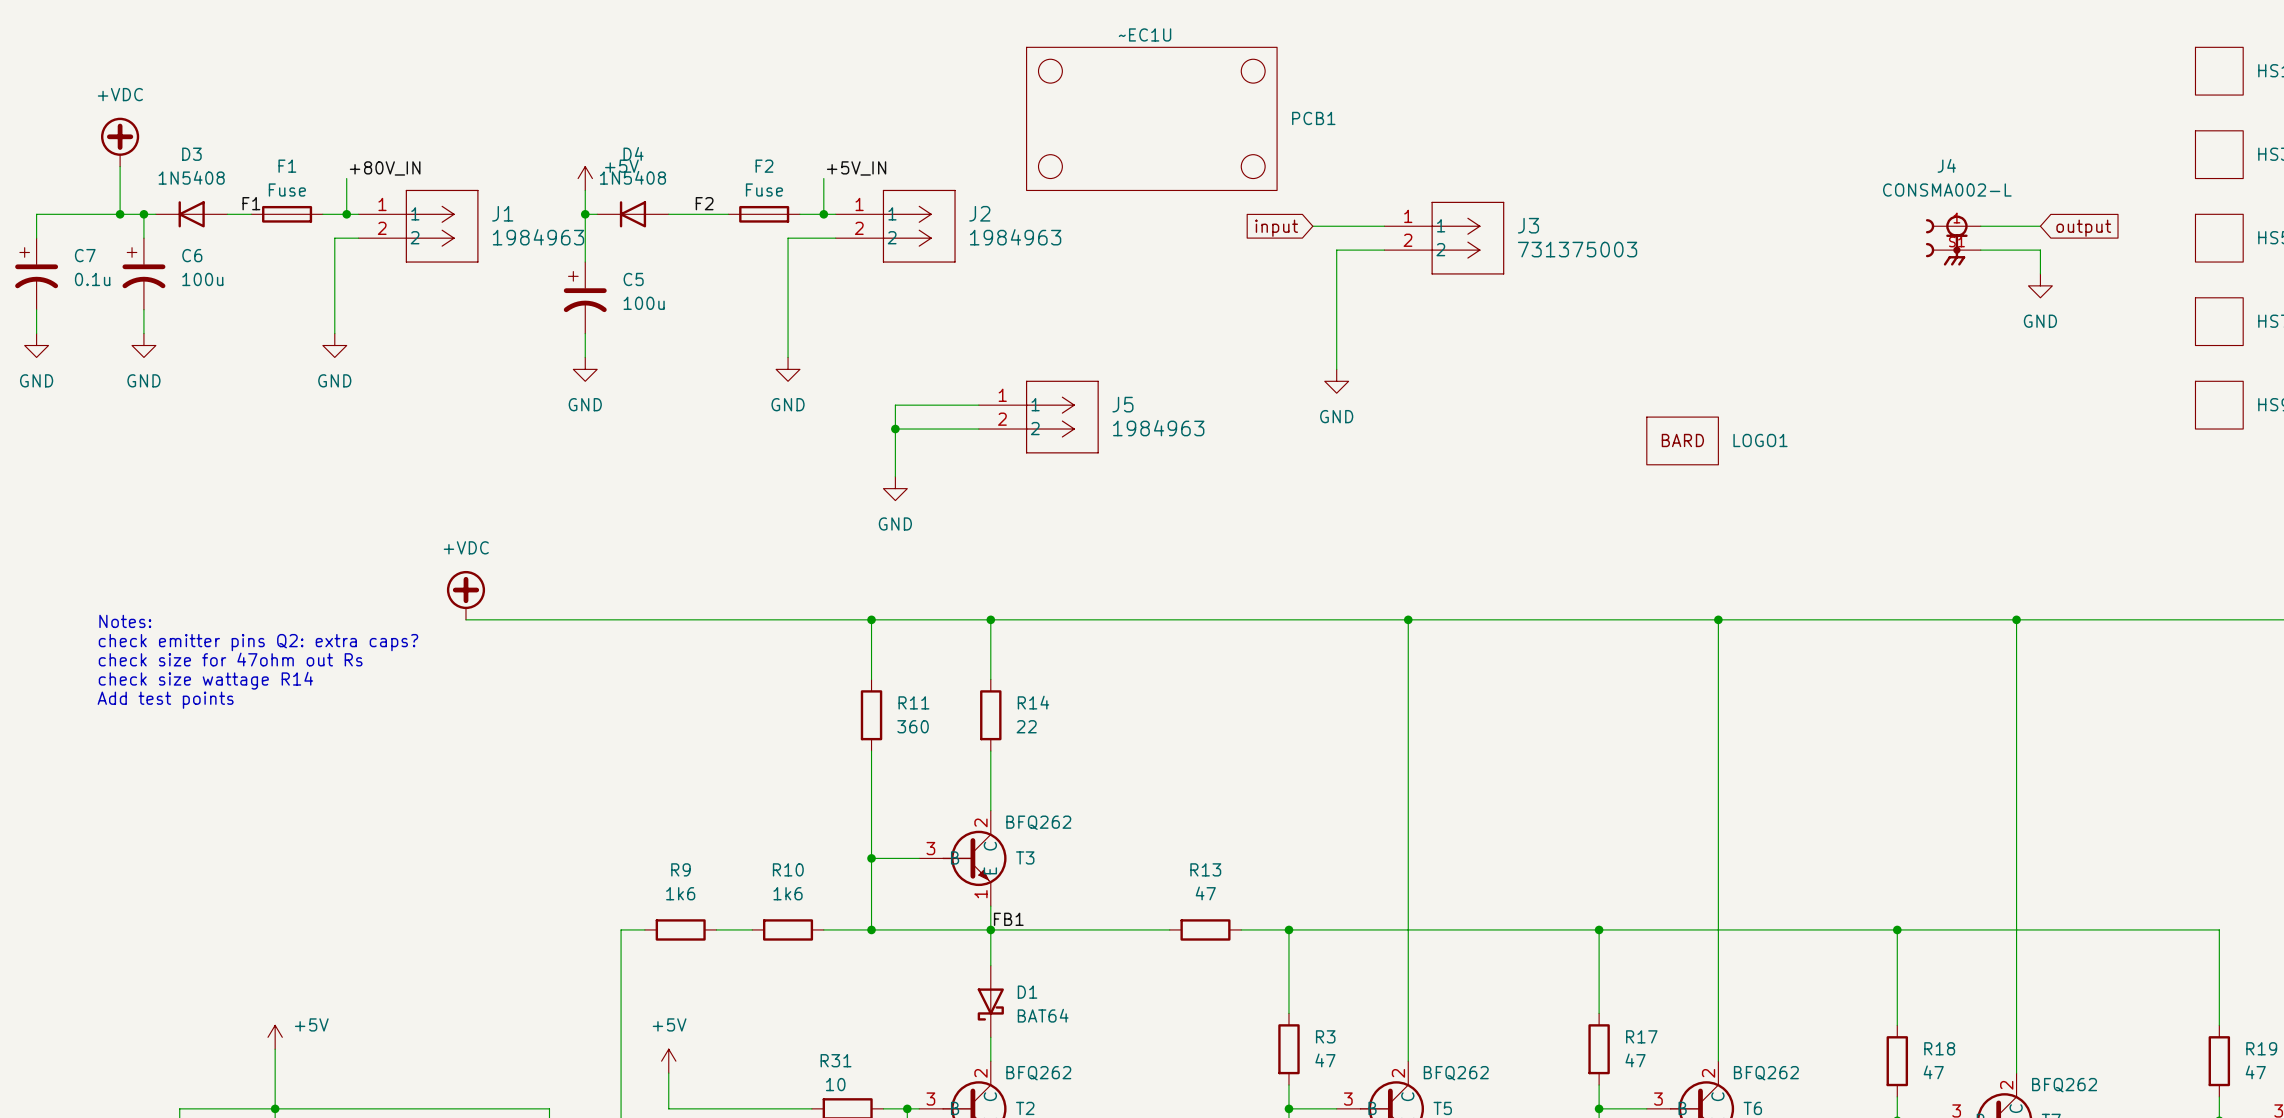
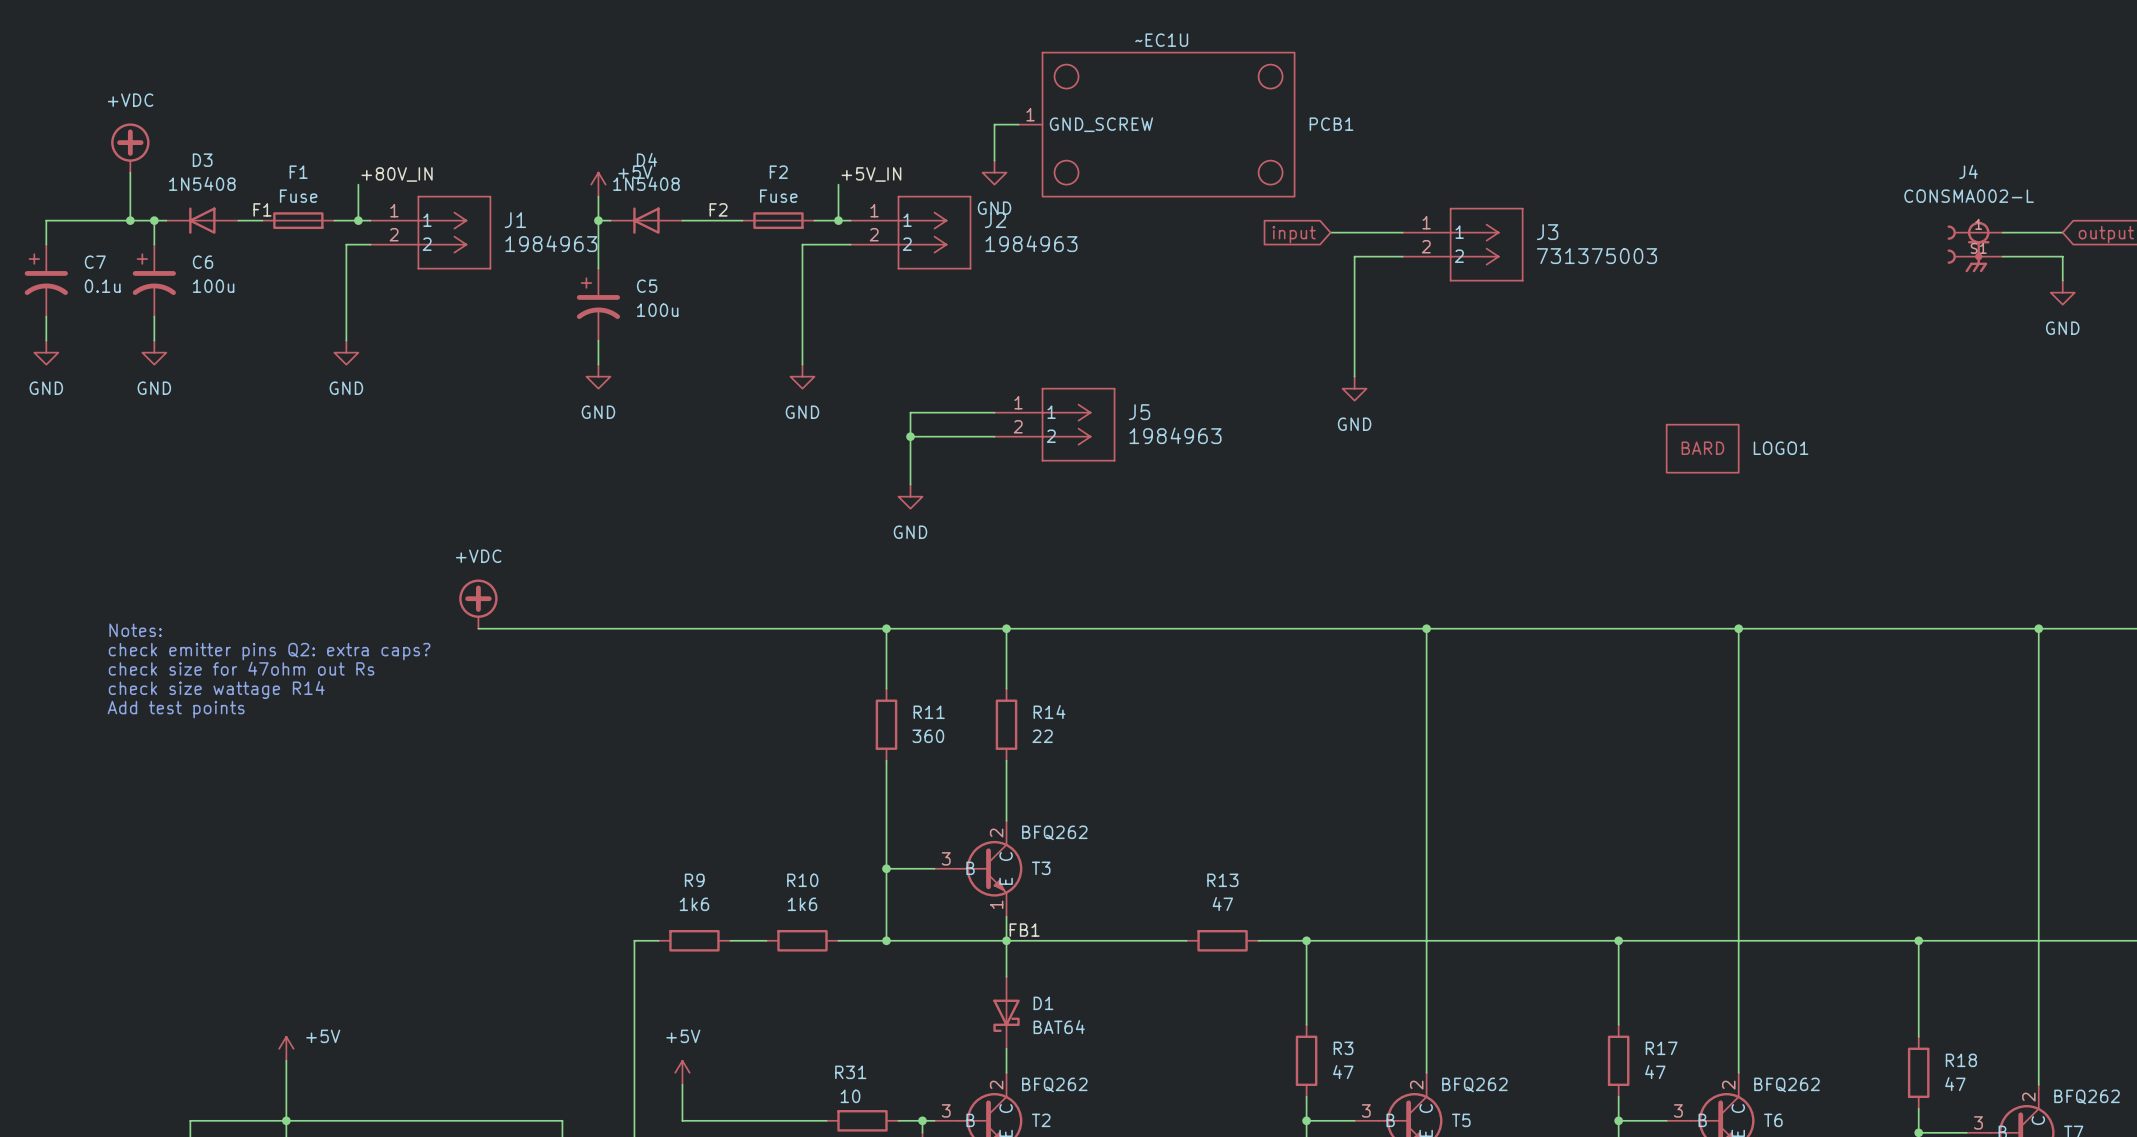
PCB1 symbol: [1026, 47, 1278, 191] -> [1018, 52, 1295, 197]
wire: none -> (1018, 124) (994, 124) (994, 160)
power symbol: none -> GND (994, 172)

